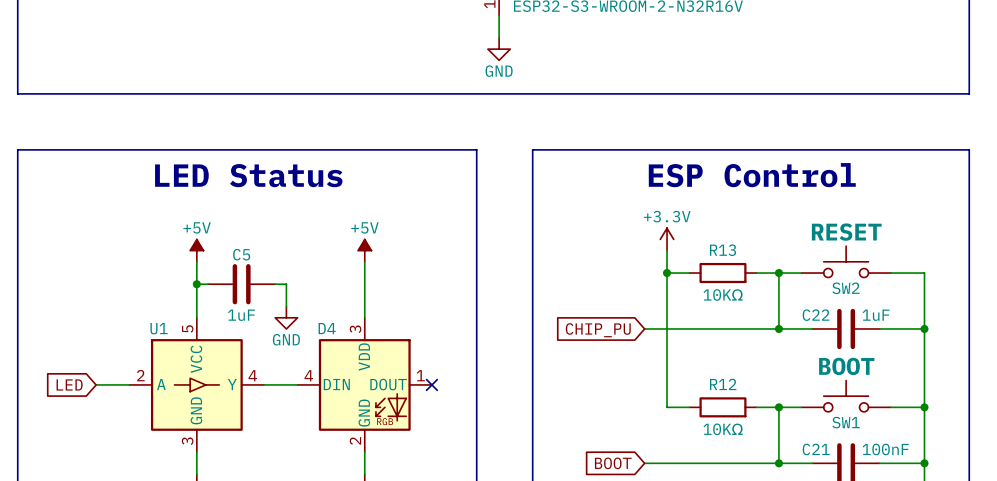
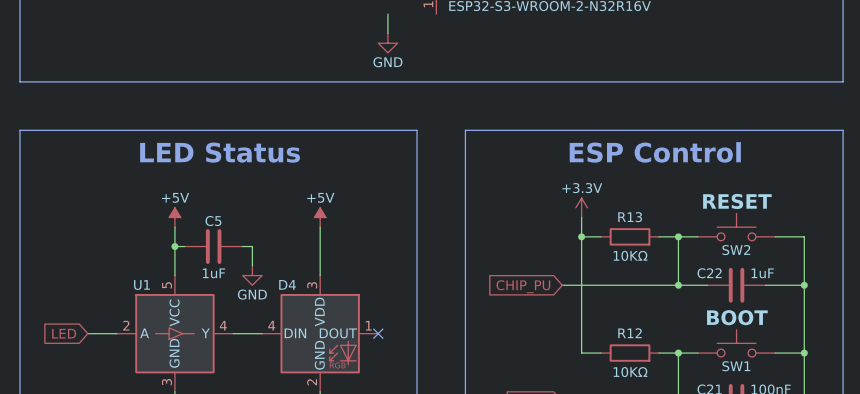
wire: (499, 15) (499, 37) -> (387, 14) (387, 33)
power symbol position: GND (499, 49) -> GND (387, 43)

